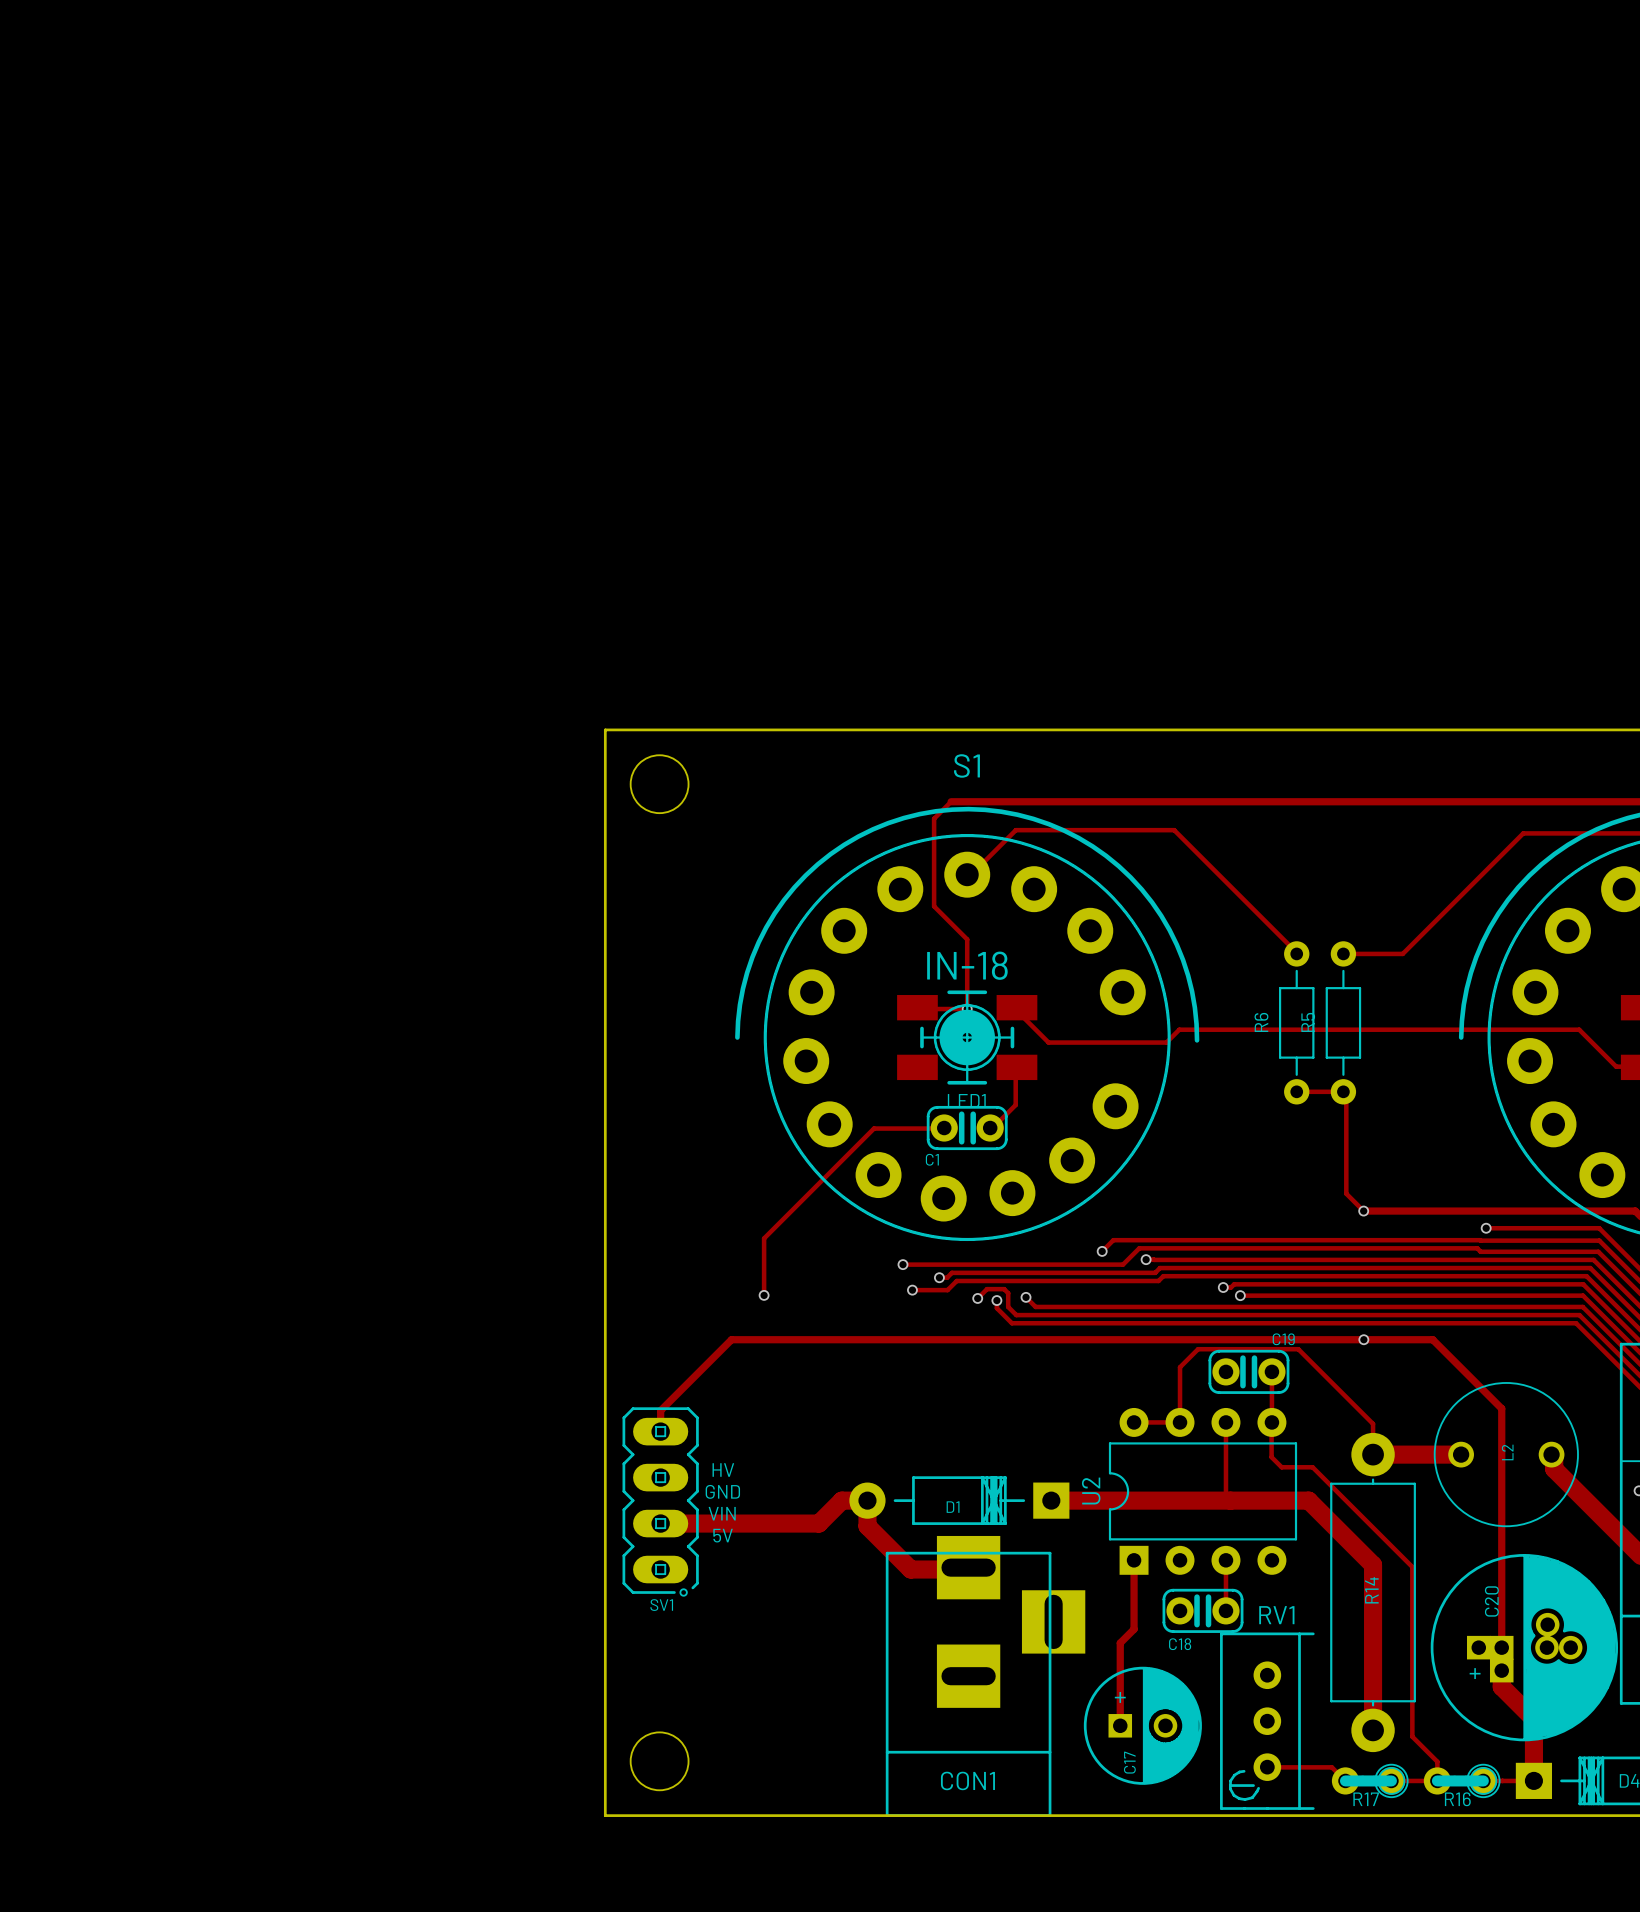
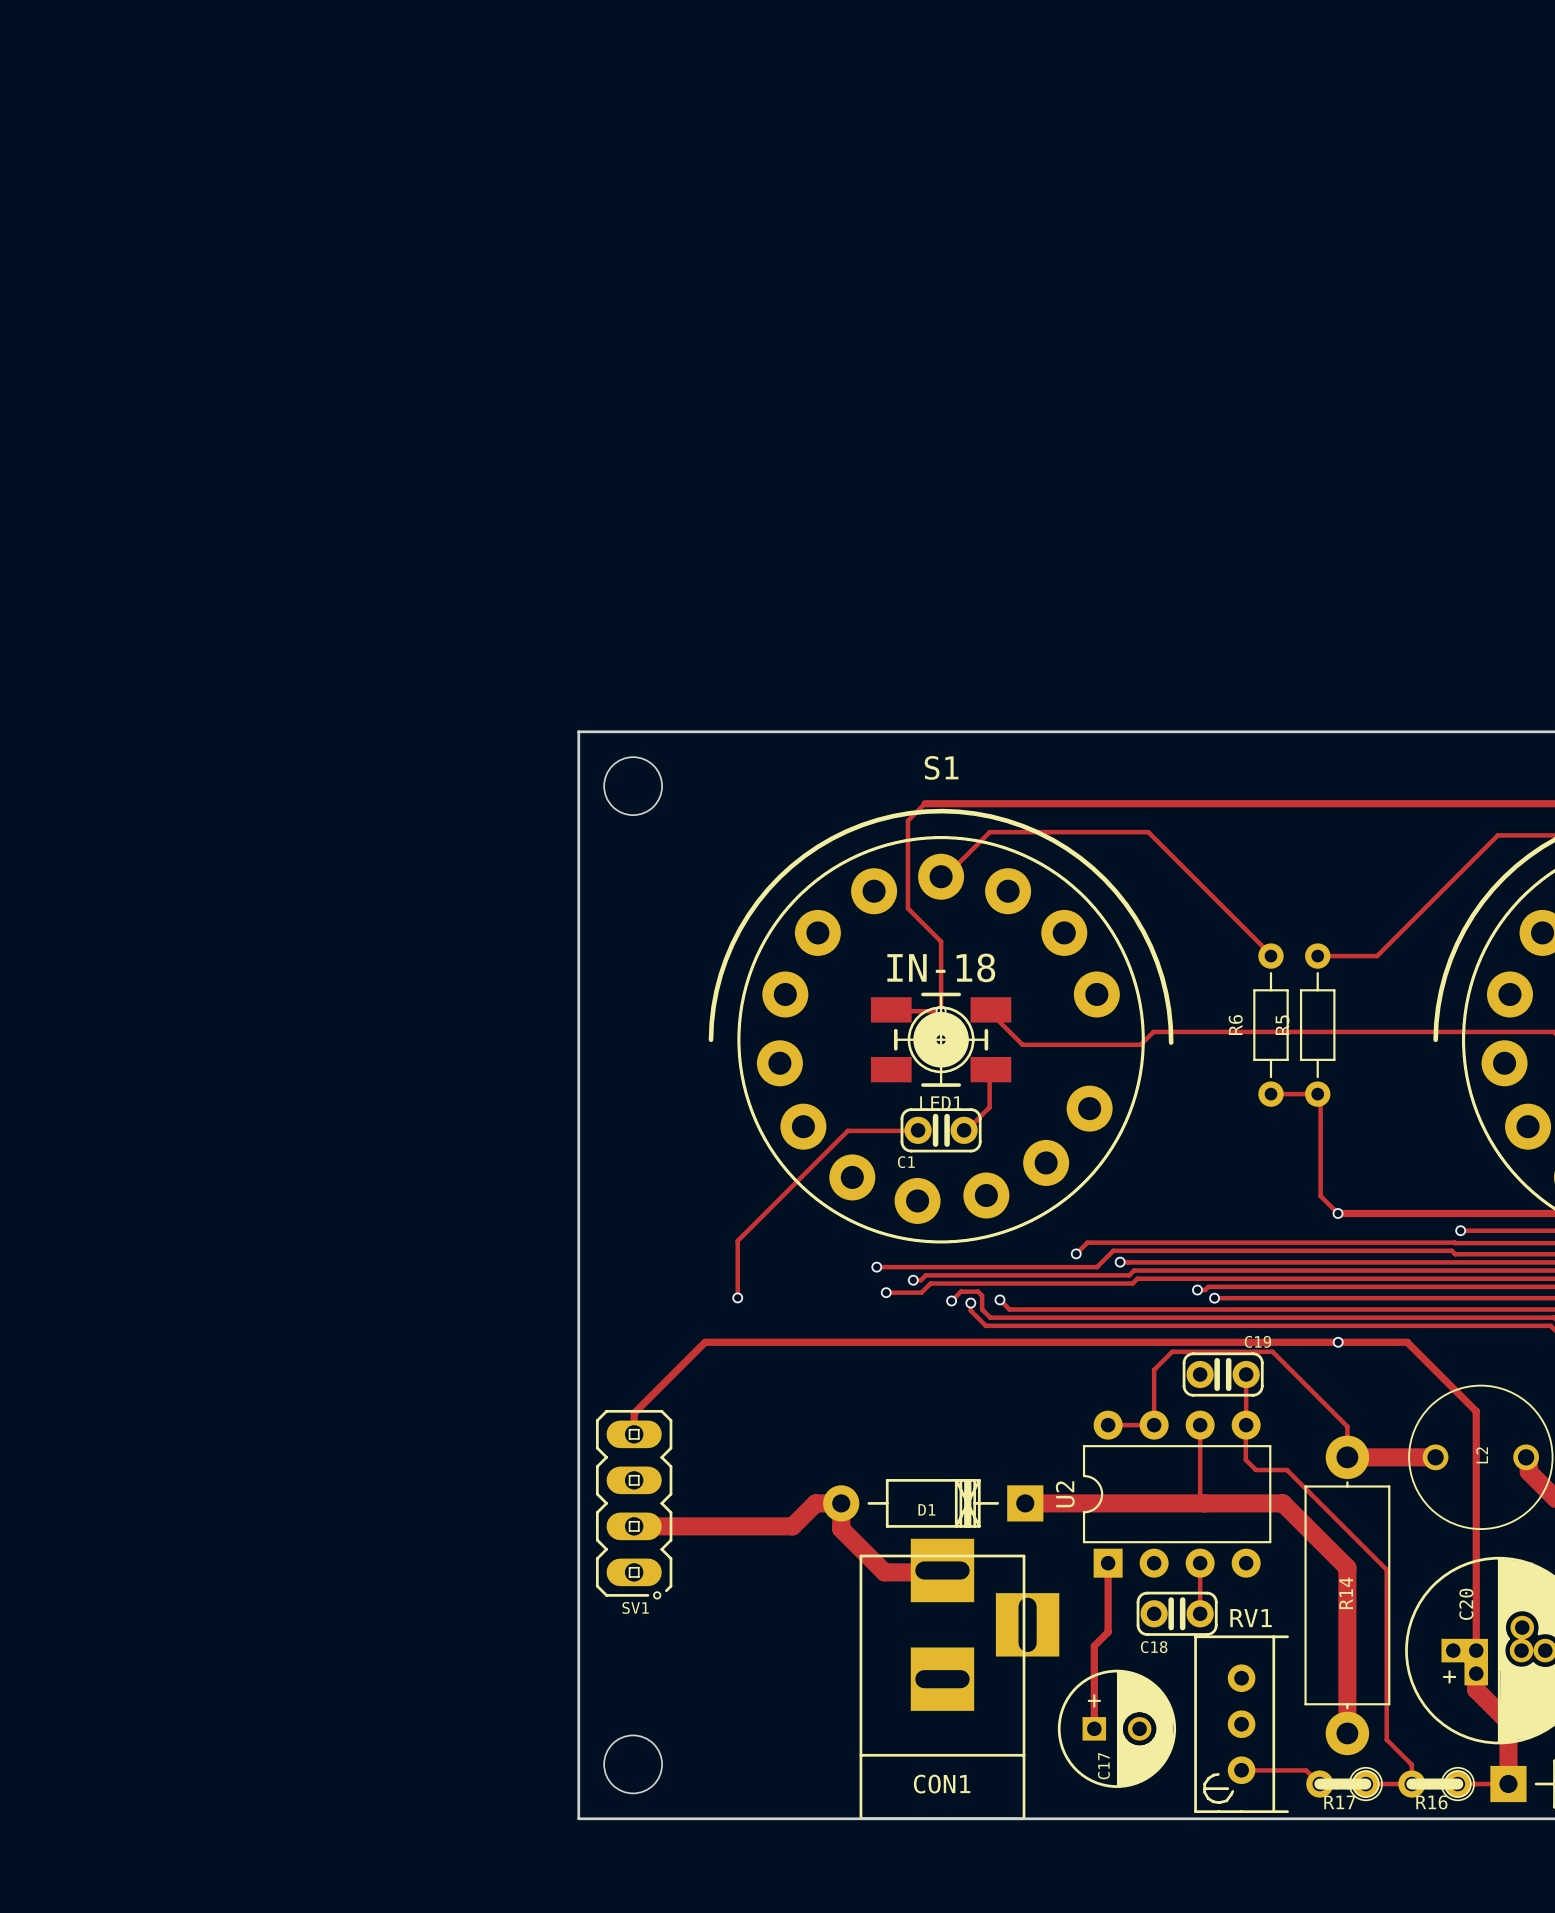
text: HV (723, 1470) -> none
text: GND (722, 1491) -> none
text: VIN (722, 1513) -> none
text: 5V (723, 1535) -> none

